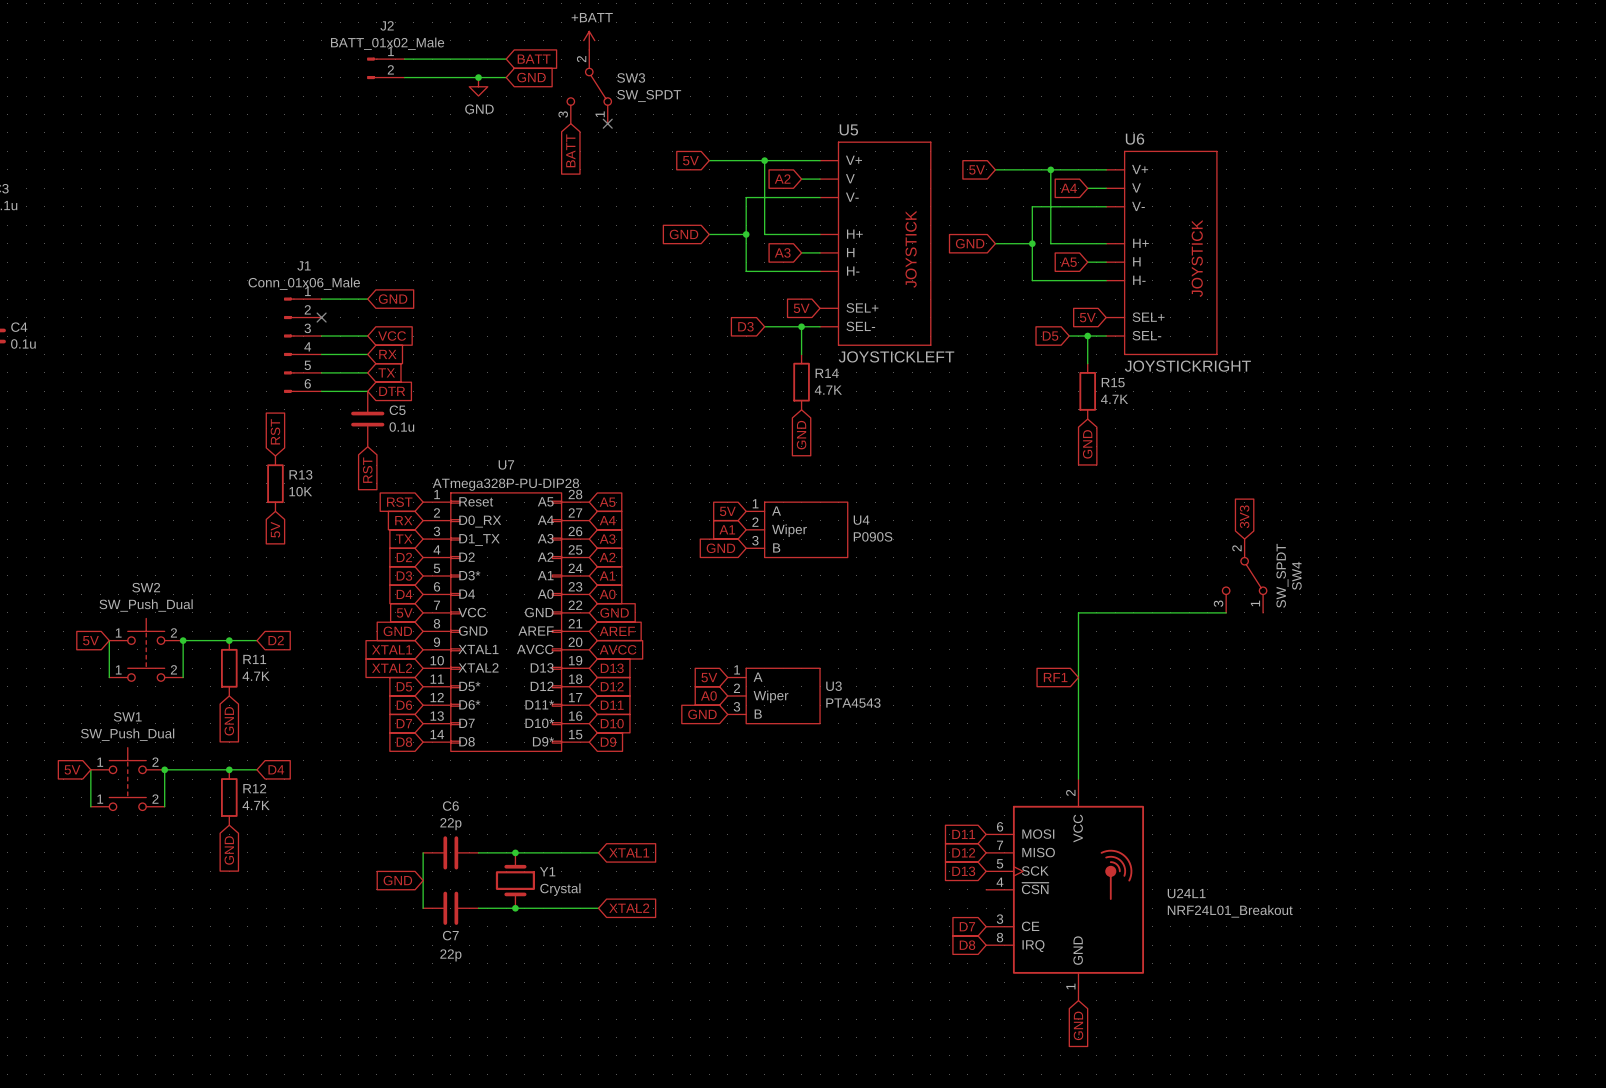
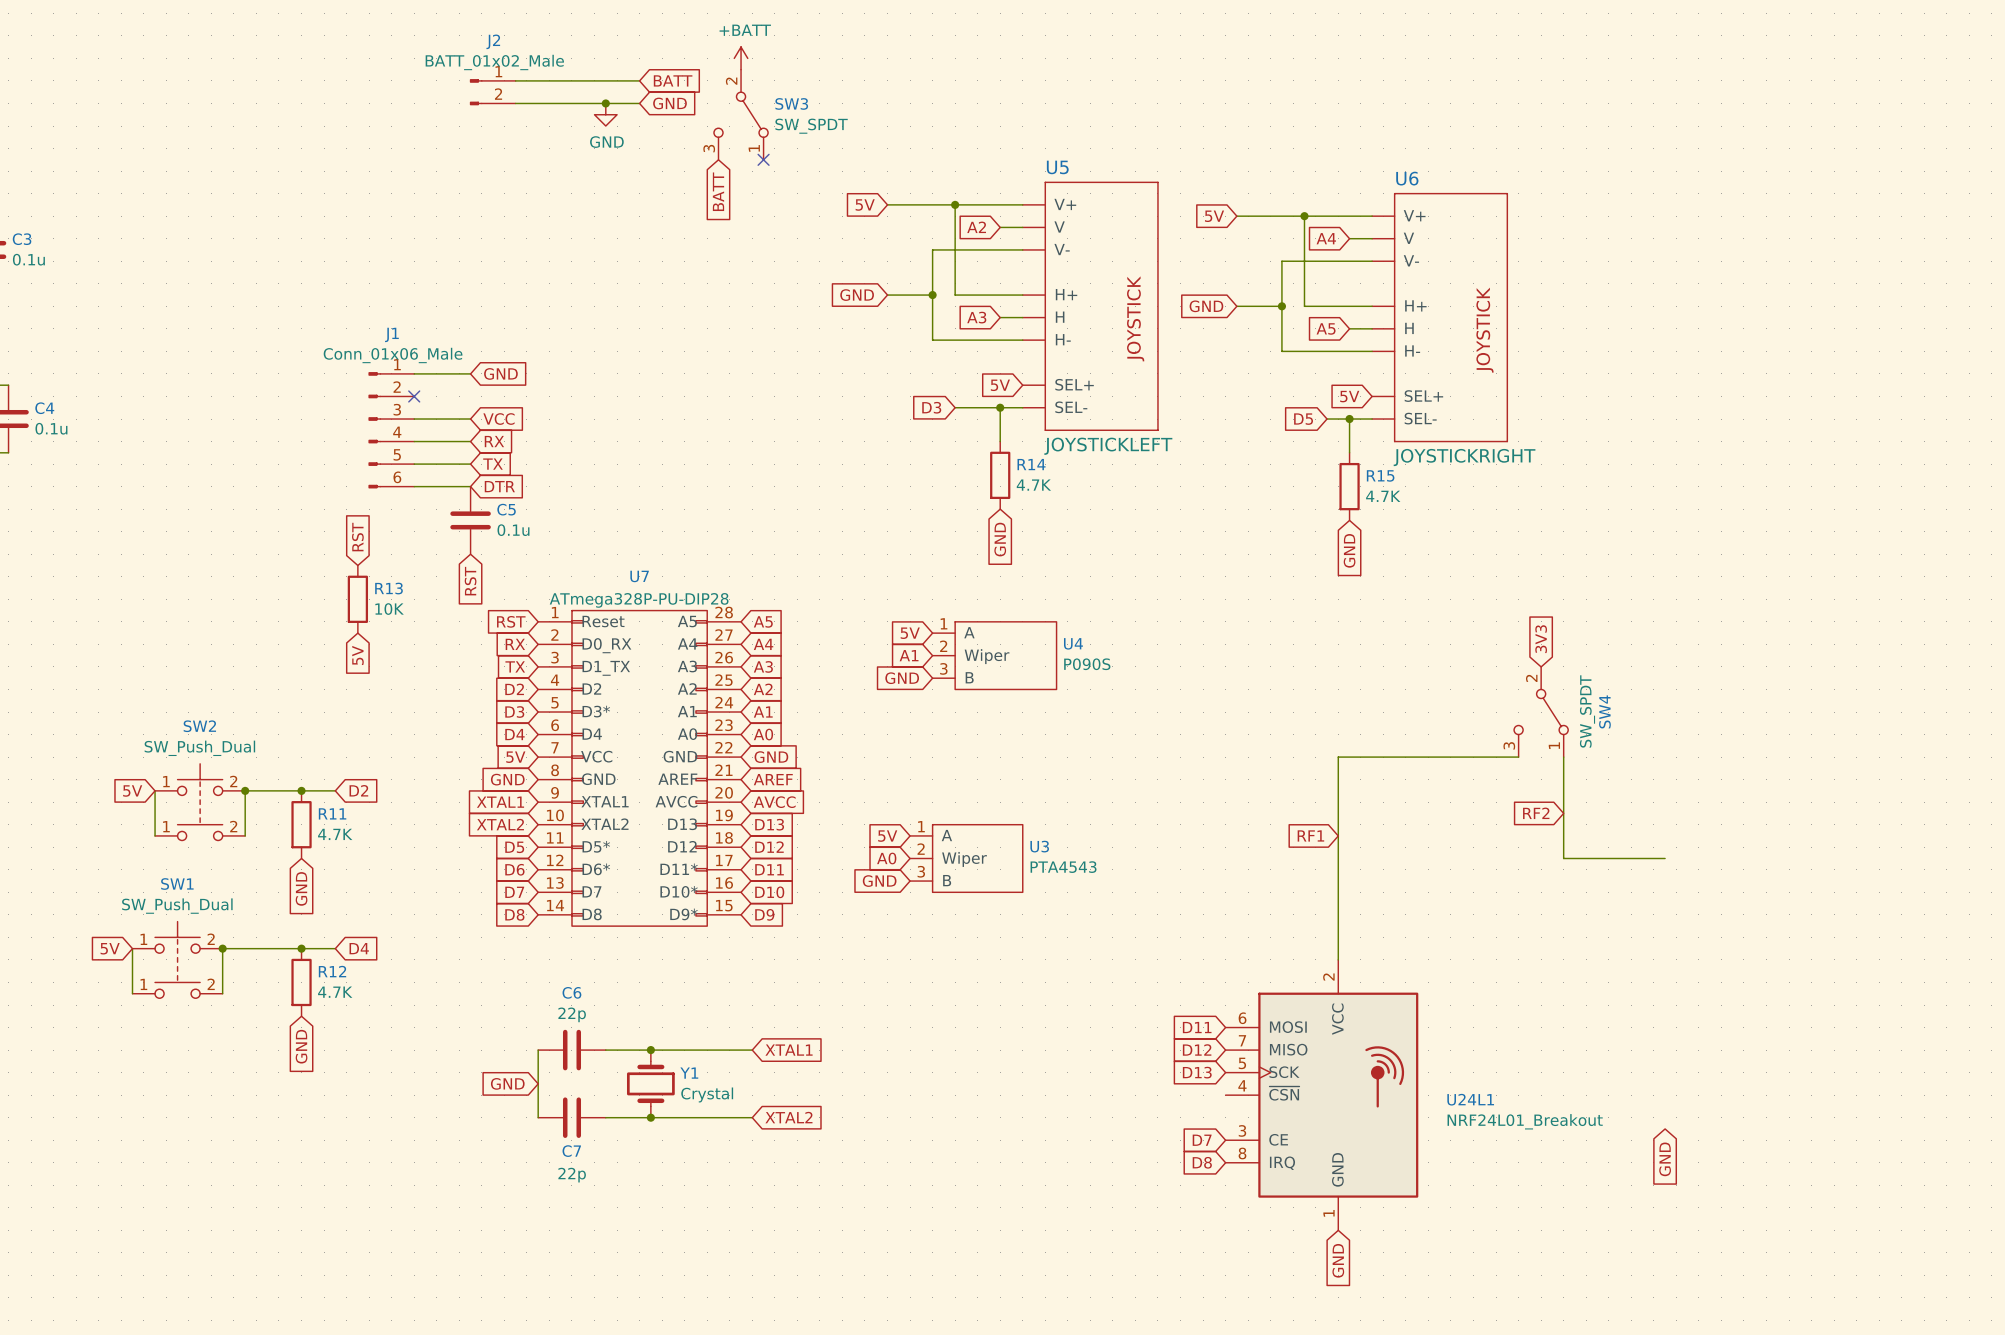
wire: none -> (1563, 757) (1563, 858) (1665, 858)
global label: none -> RF2 (1536, 813)
global label: none -> GND (1665, 1159)

